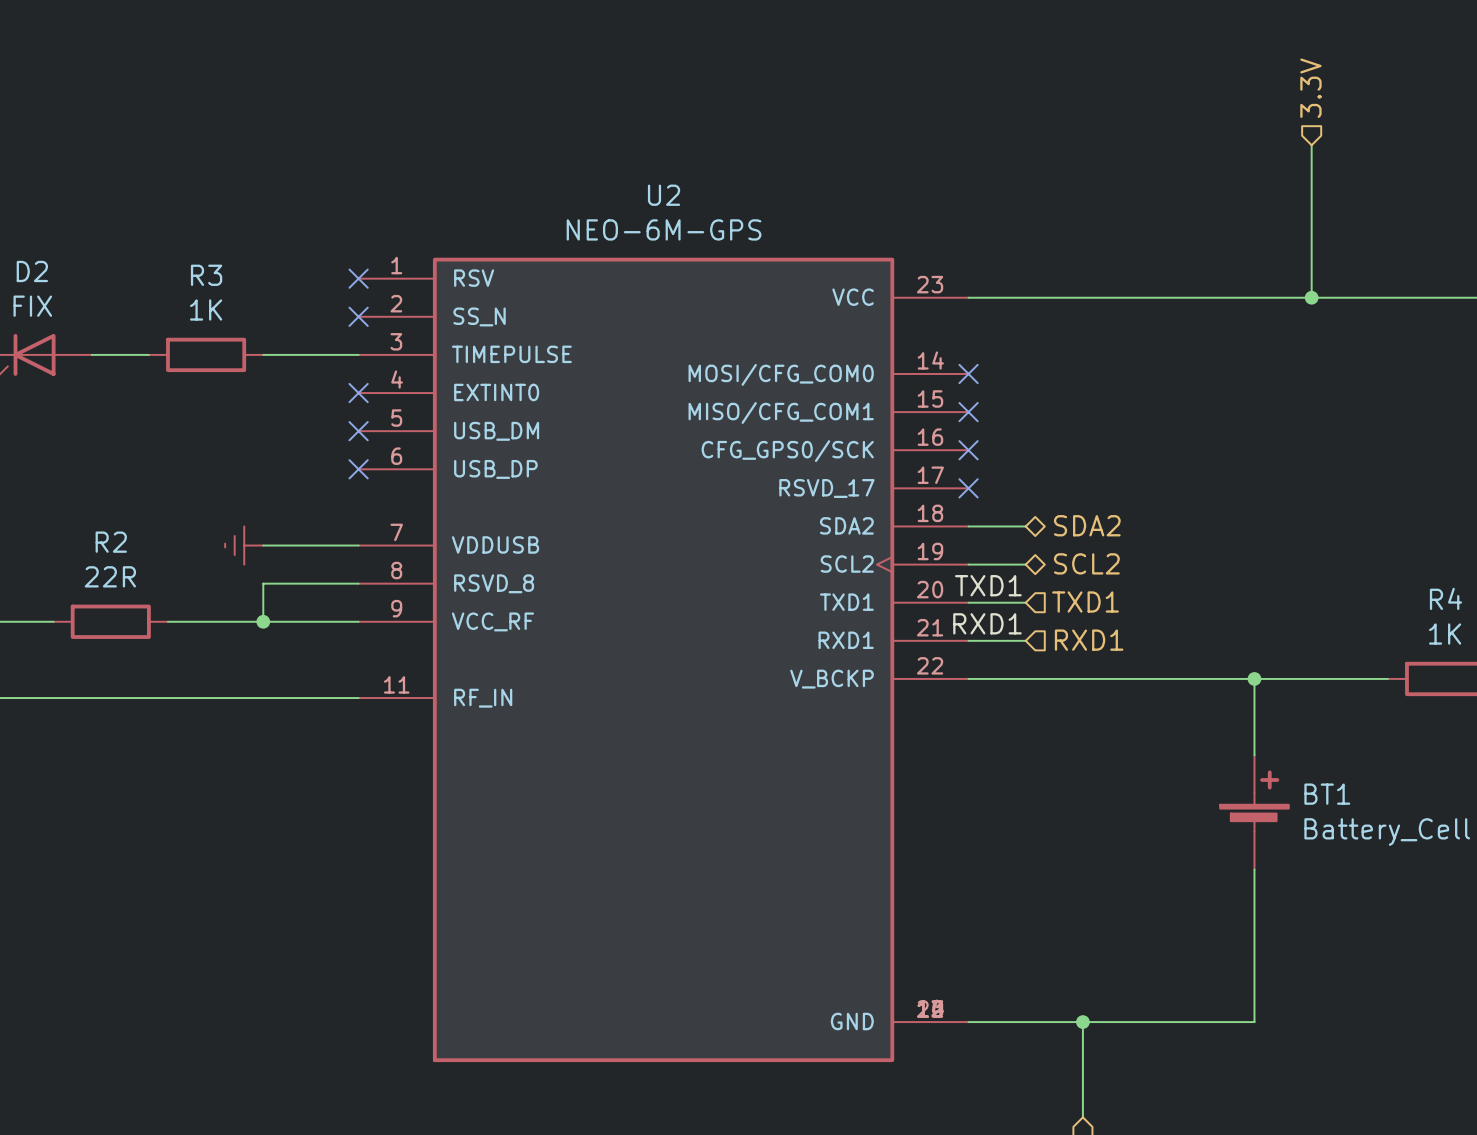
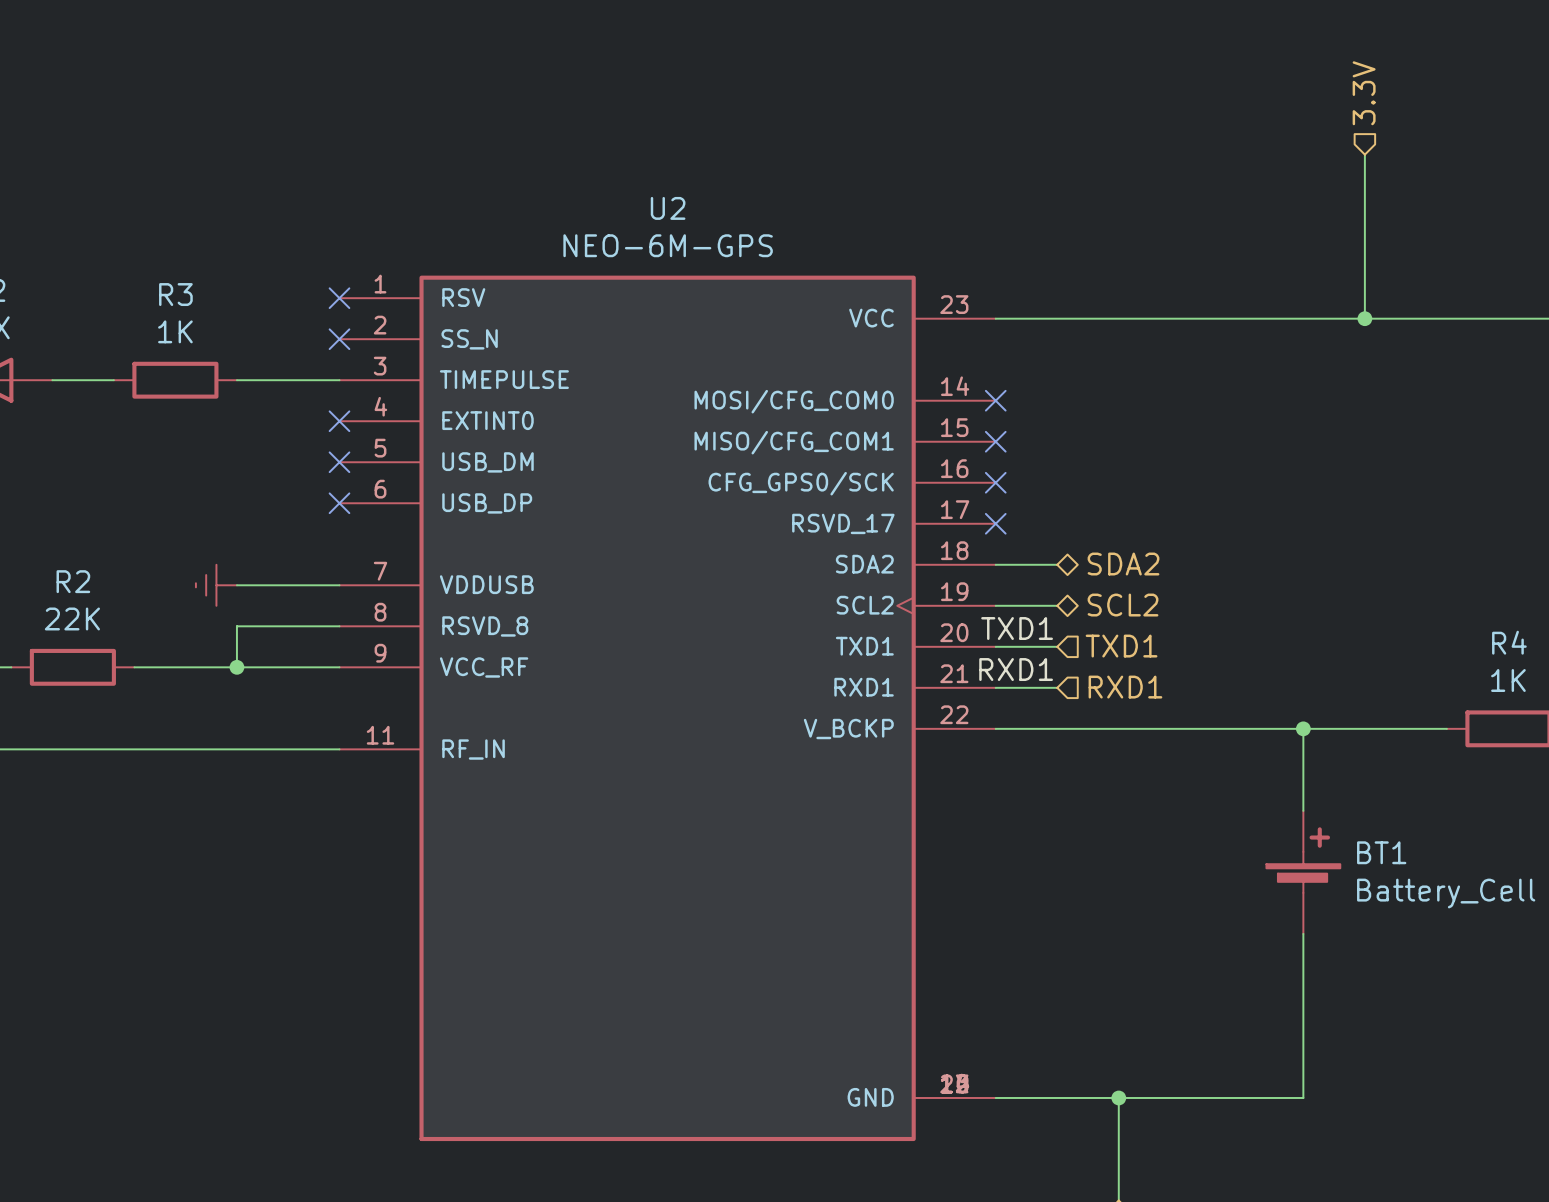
R2 value: 22R (110, 576) -> 22K (72, 618)

